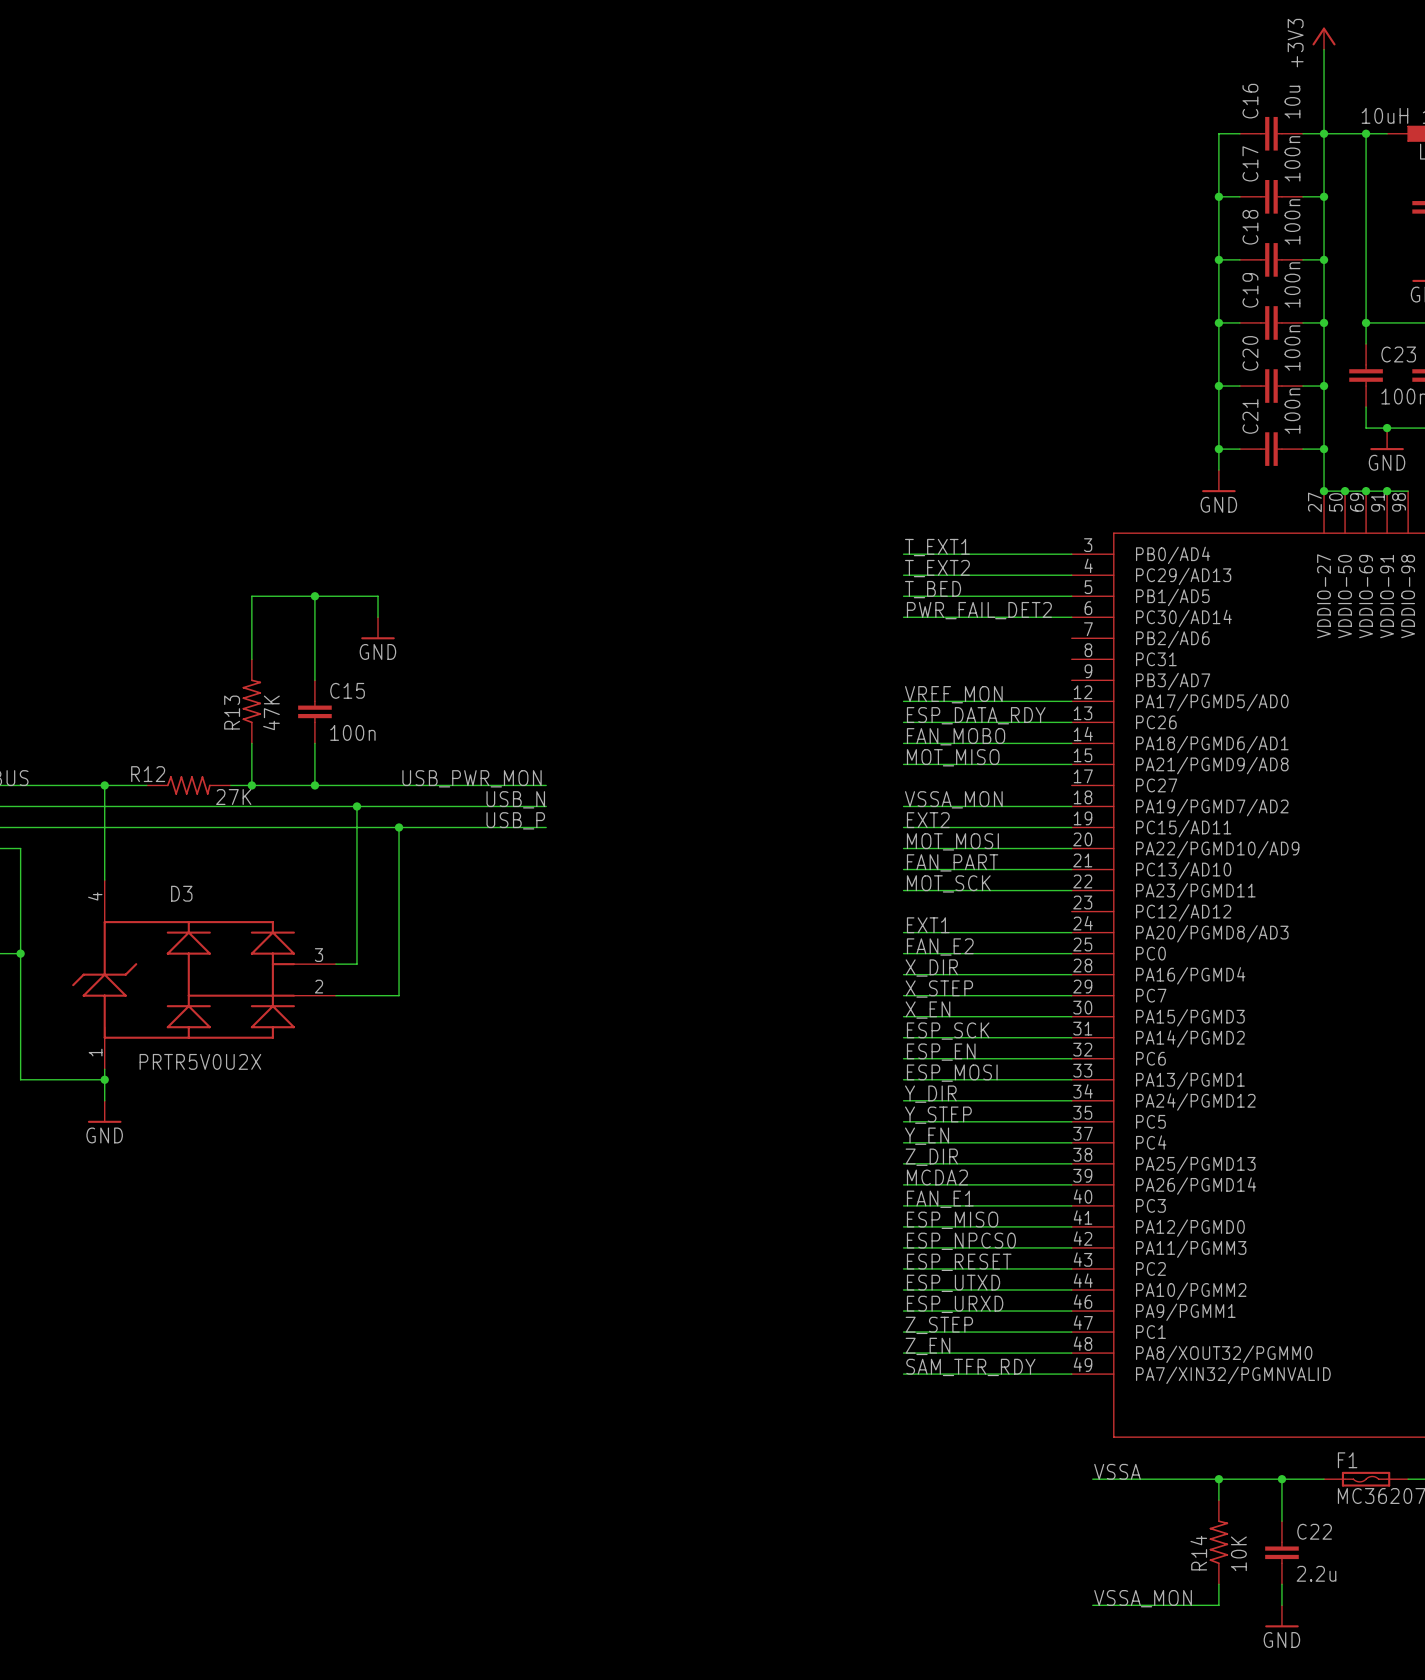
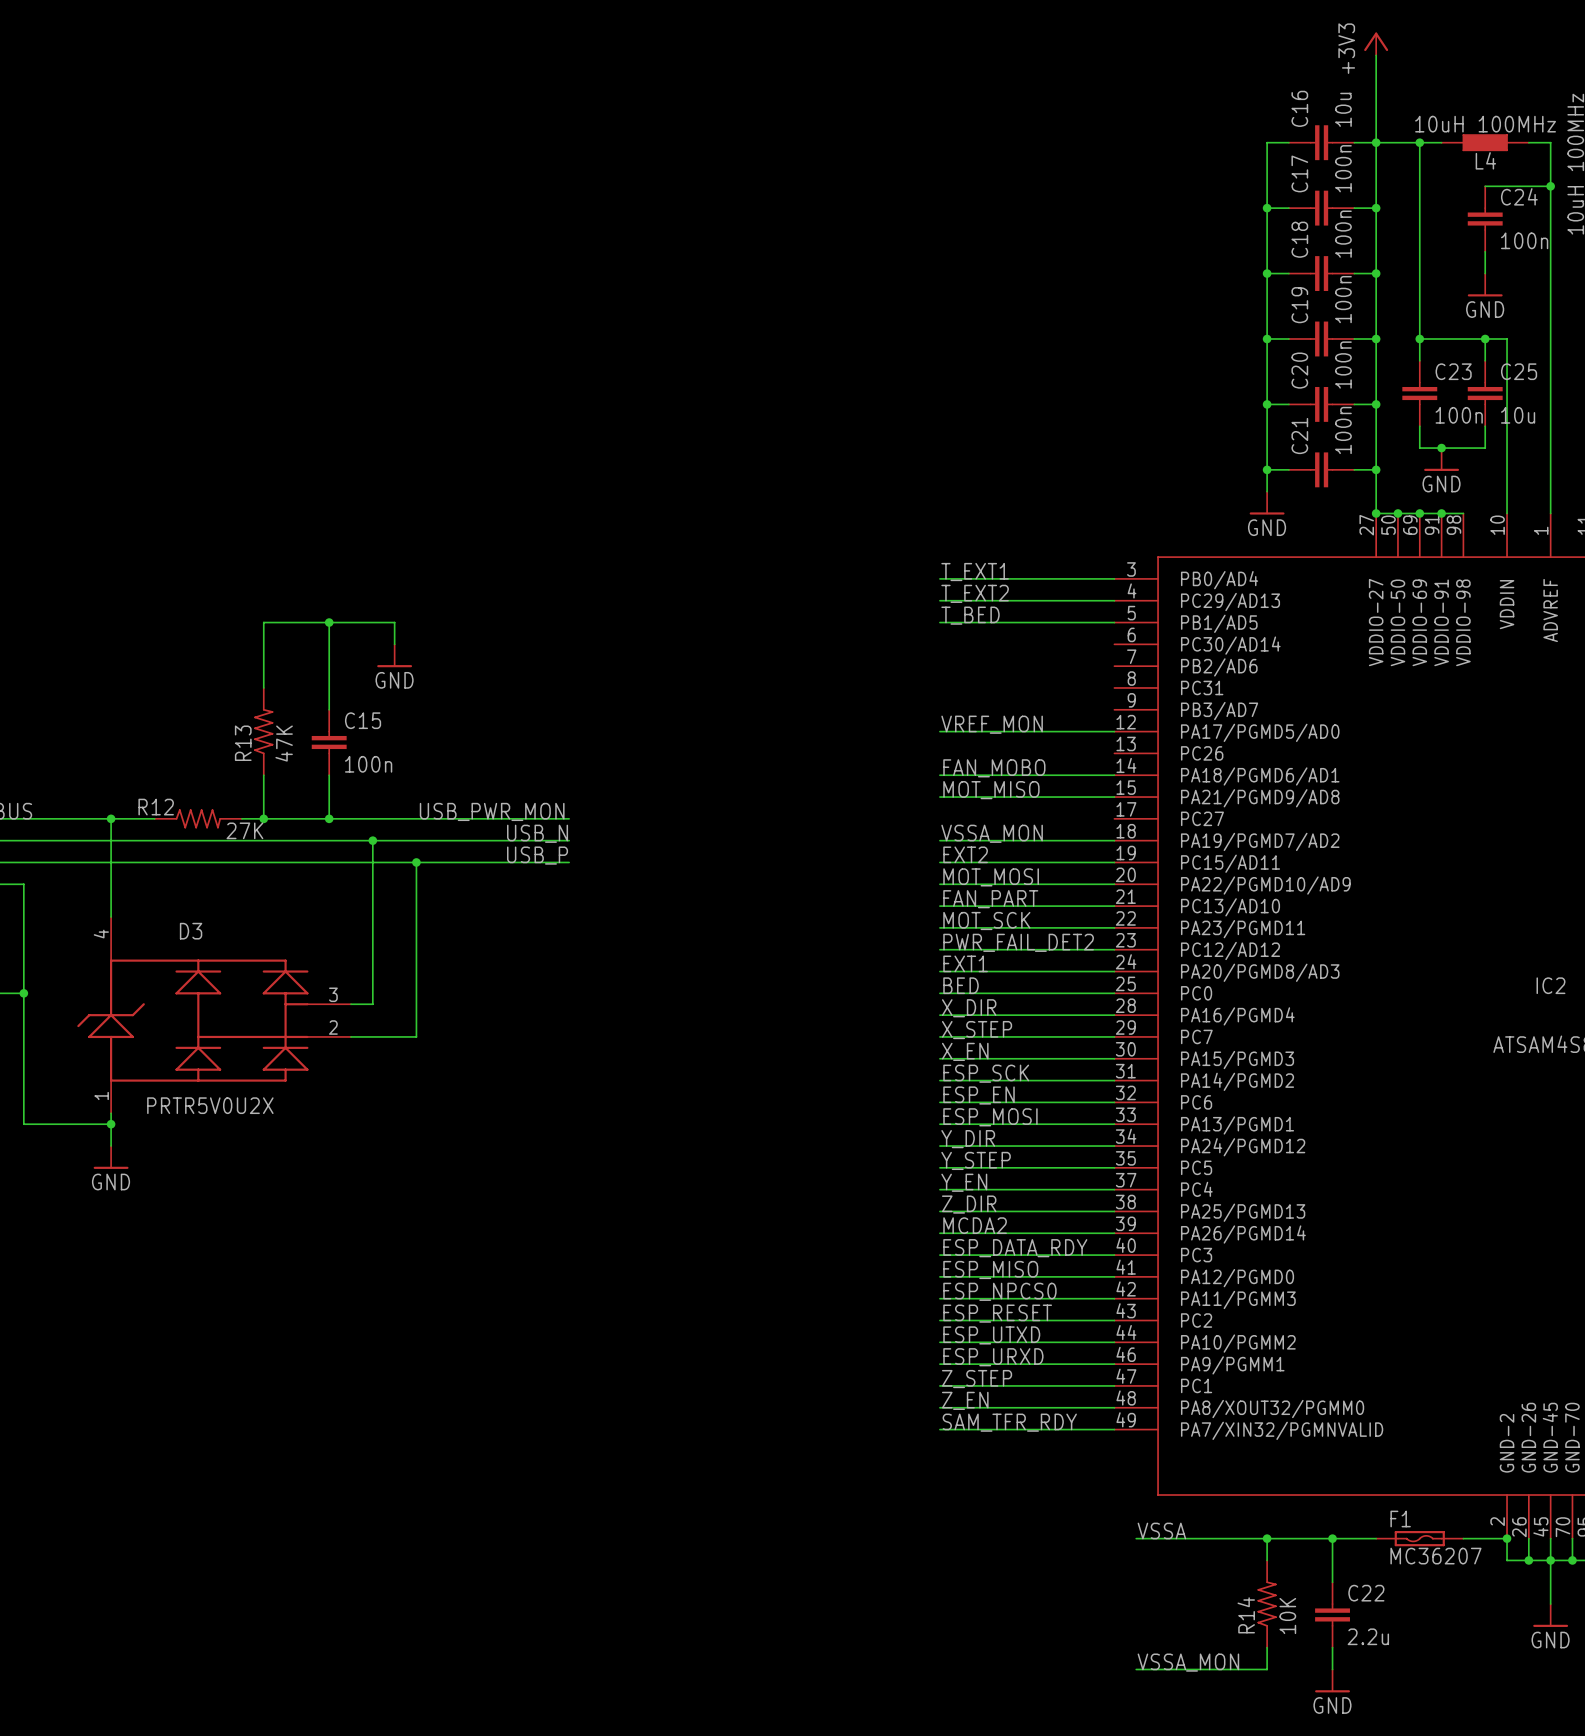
label: PWR_FAIL_DET2 (979, 610) -> none
wire: (903, 617) (1071, 617) -> none
label: ESP_DATA_RDY (976, 715) -> none
wire: (903, 722) (1071, 722) -> (939, 949) (1114, 949)
label: none -> PWR_FAIL_DET2 (1018, 942)
label: FAN_E2 (940, 946) -> BED (961, 985)
label: FAN_E1 (940, 1199) -> ESP_DATA_RDY (1015, 1248)

